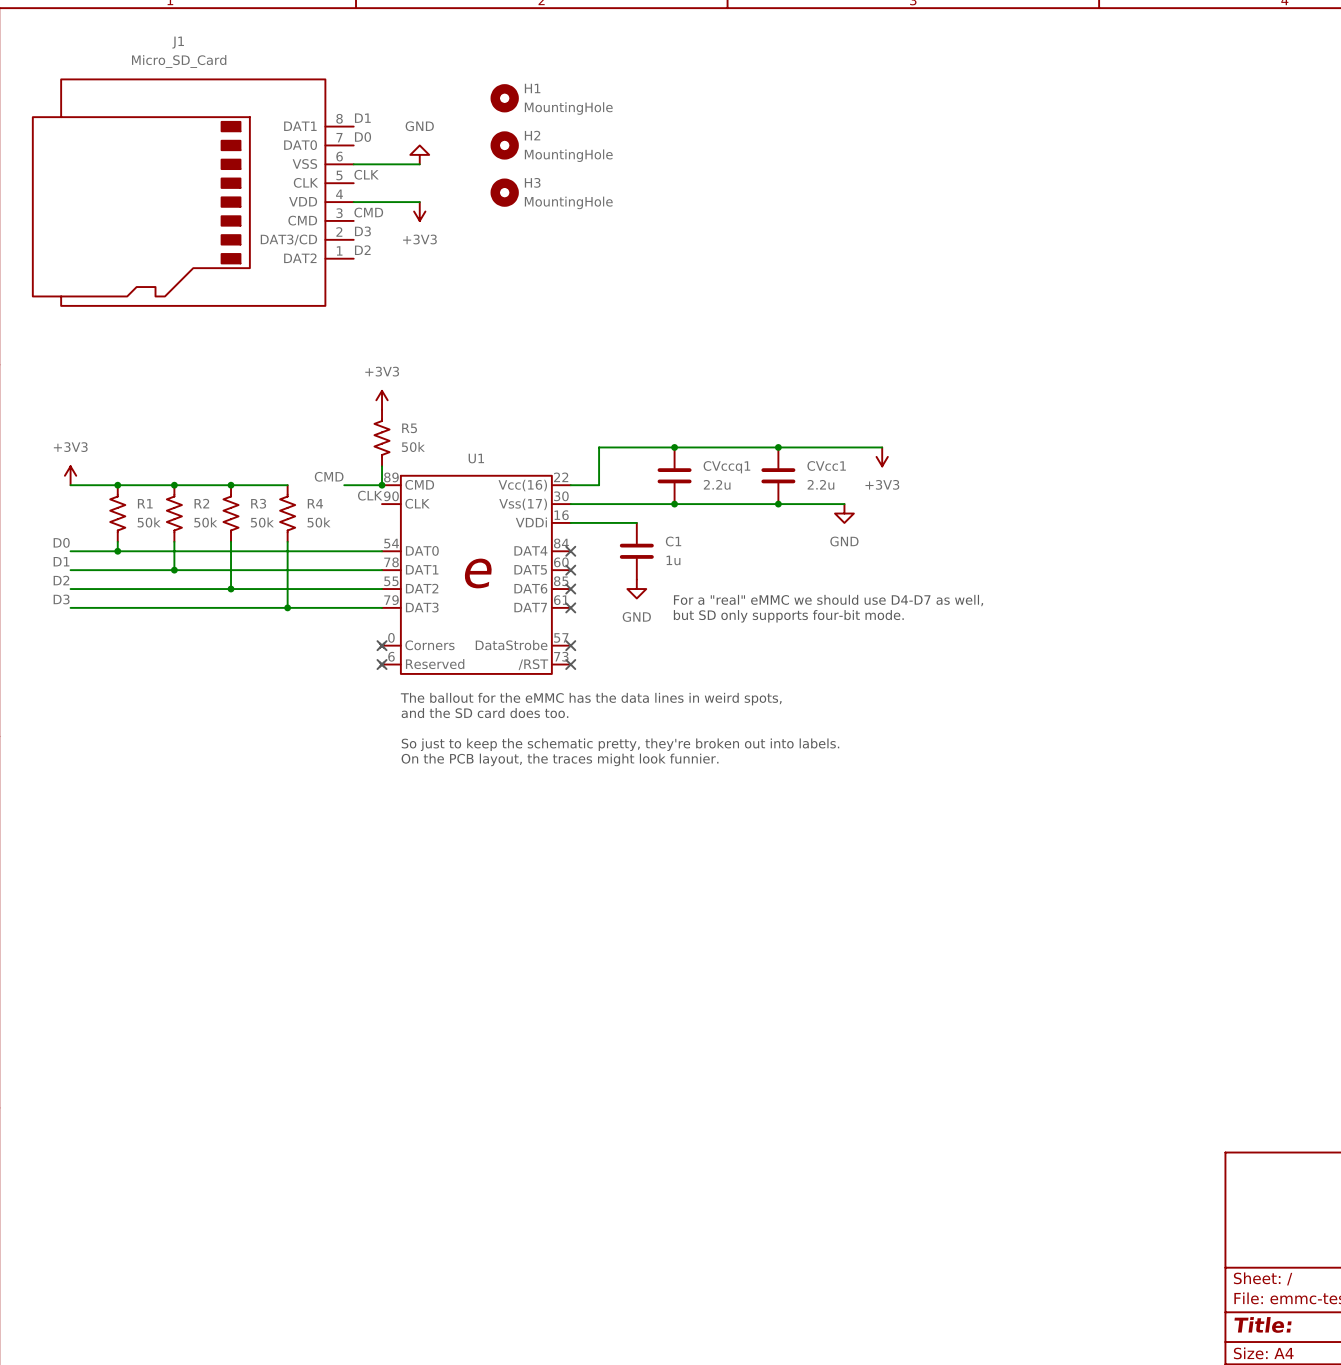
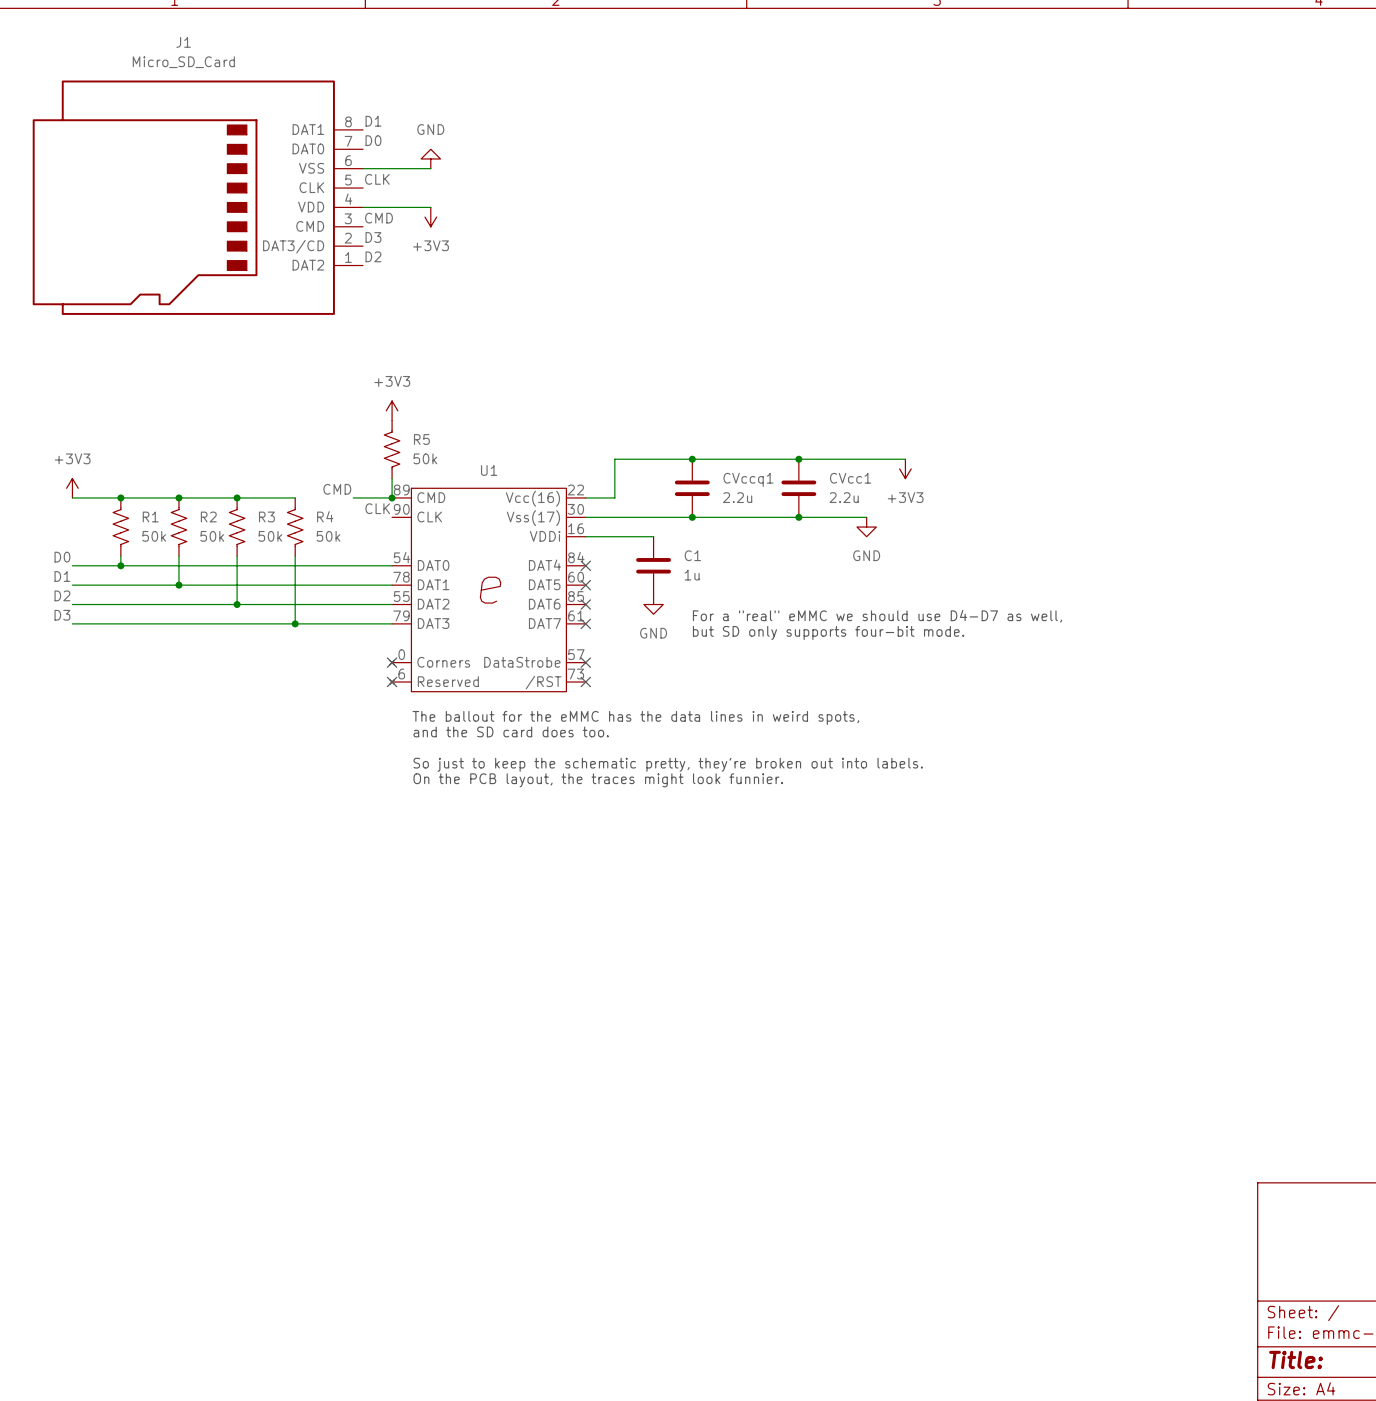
H1: MountingHole (504, 98) -> none
H2: MountingHole (504, 145) -> none
H3: MountingHole (504, 192) -> none

